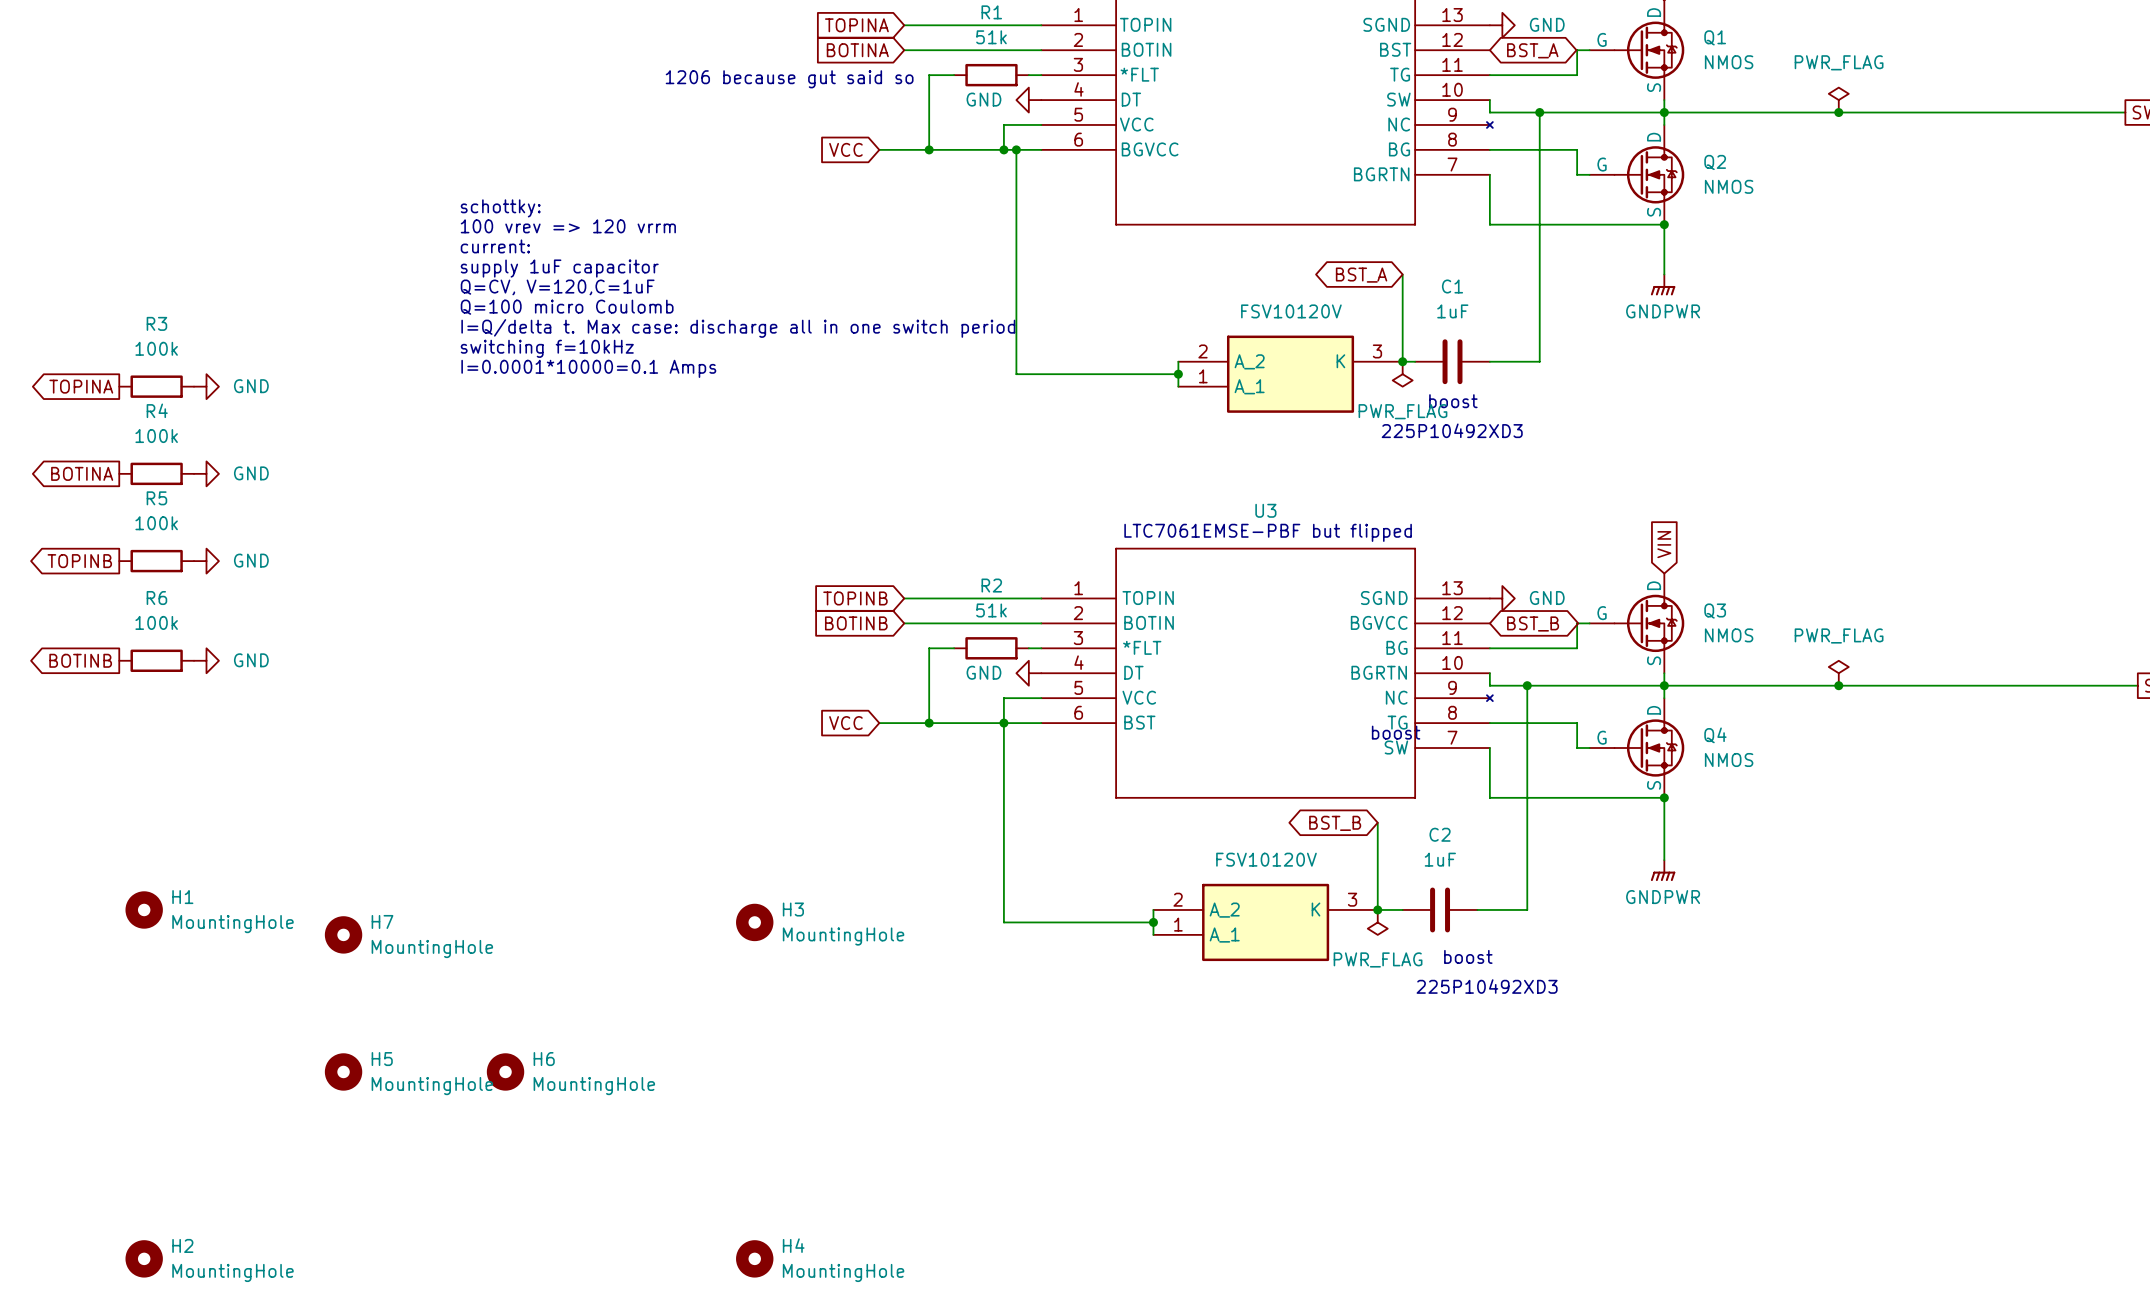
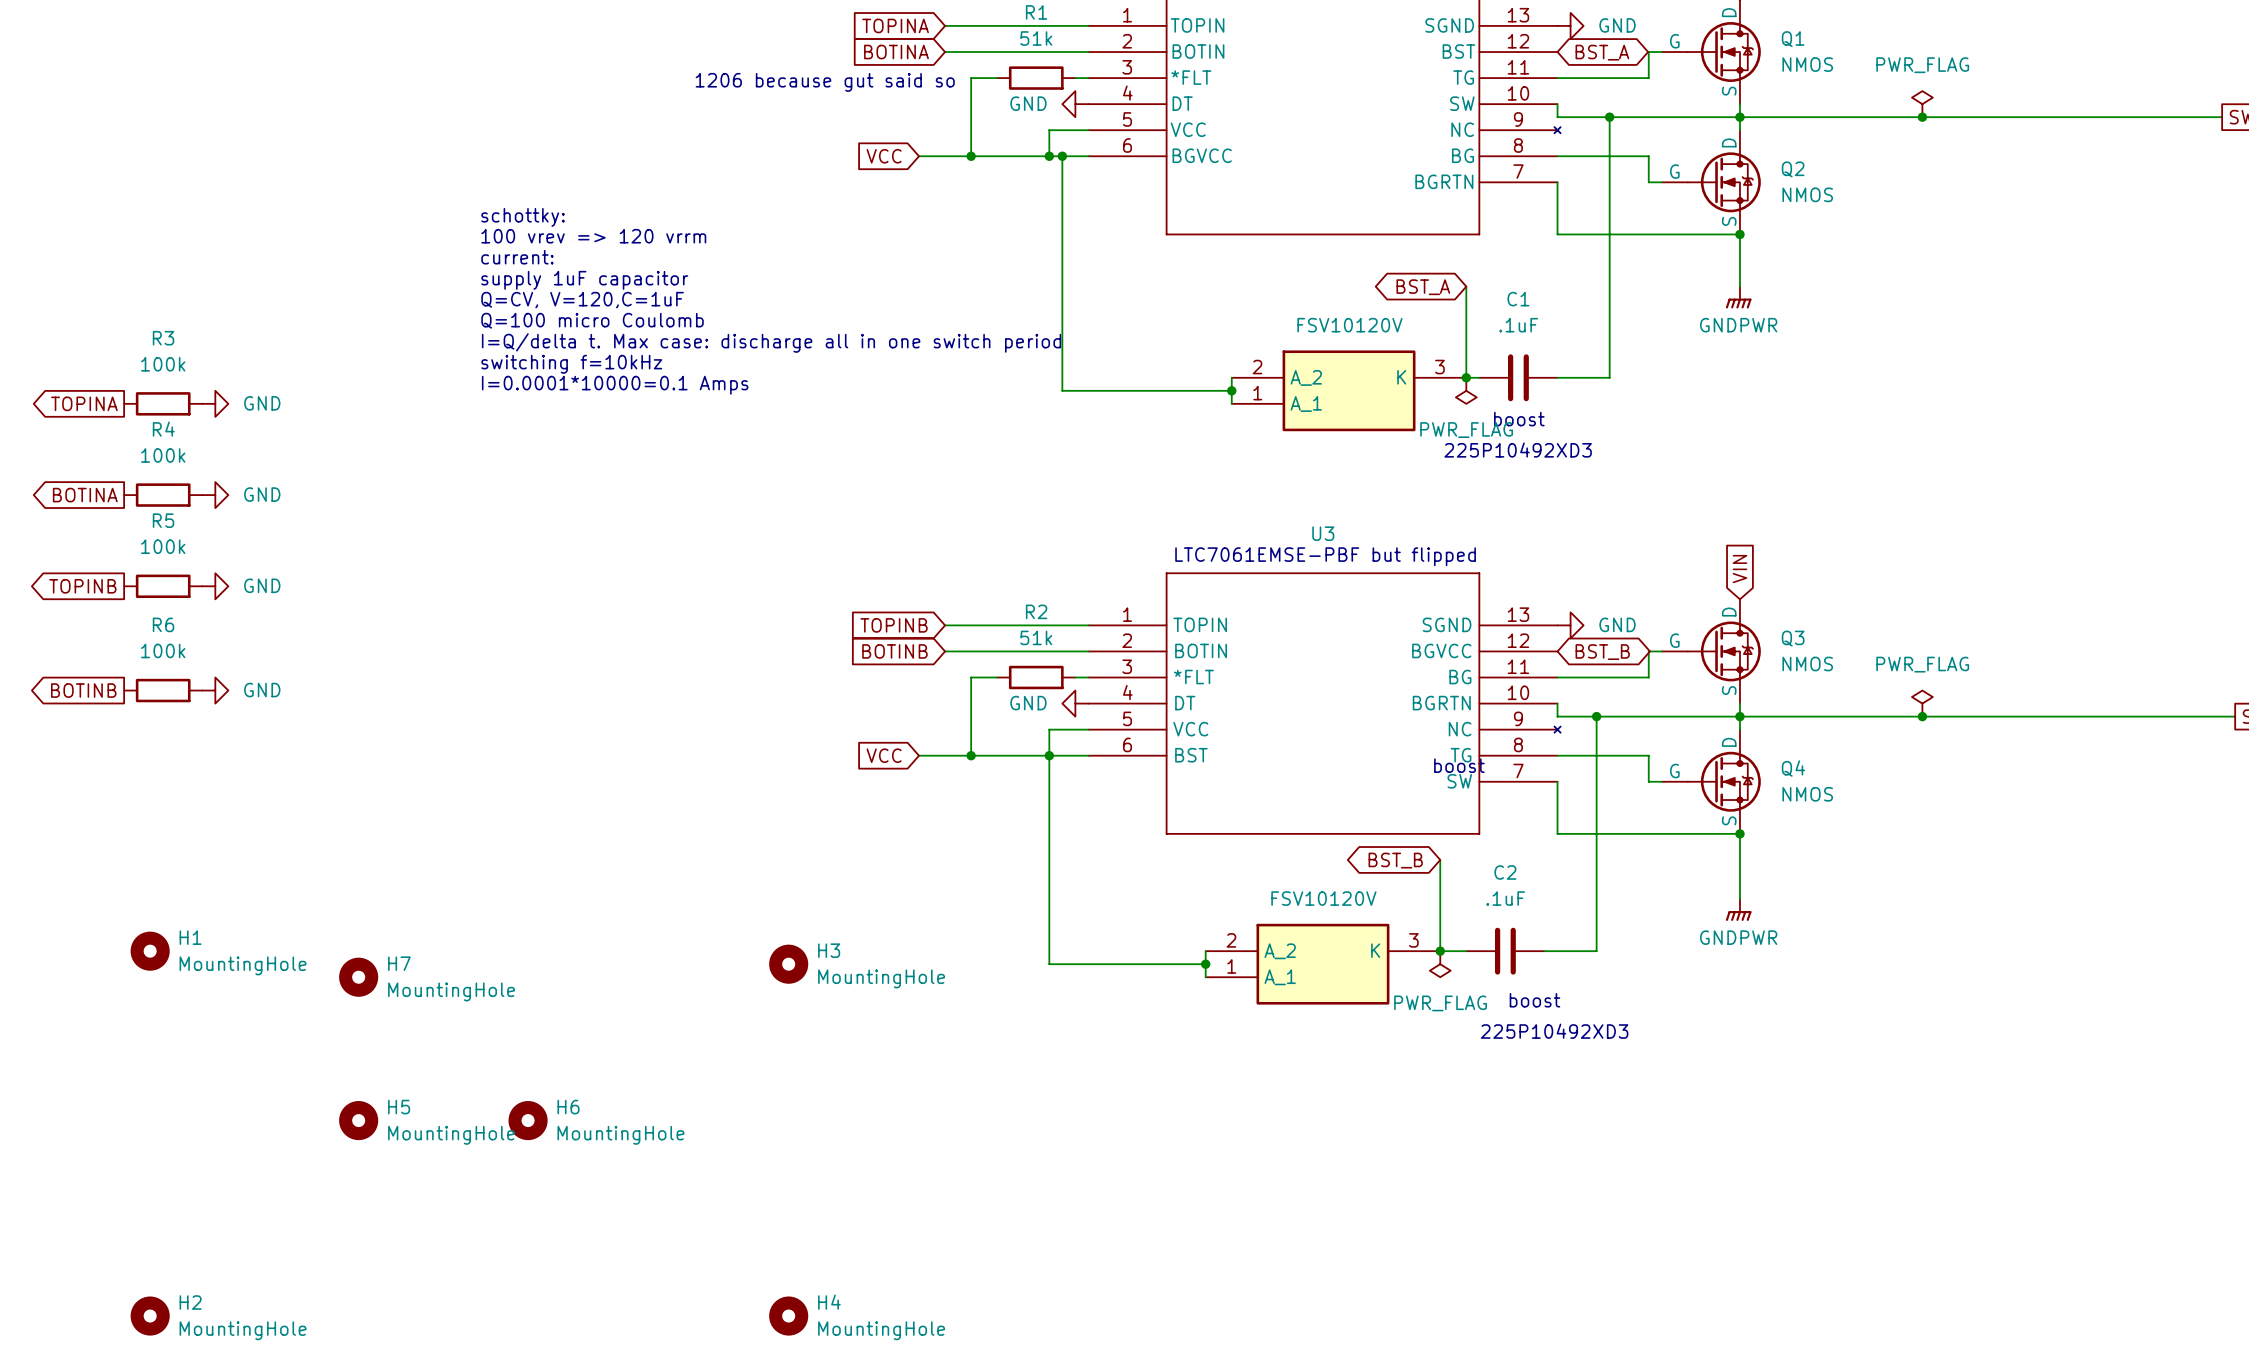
C1 value: 1uF (1452, 311) -> .1uF (1518, 325)
C2 value: 1uF (1440, 859) -> .1uF (1505, 898)

